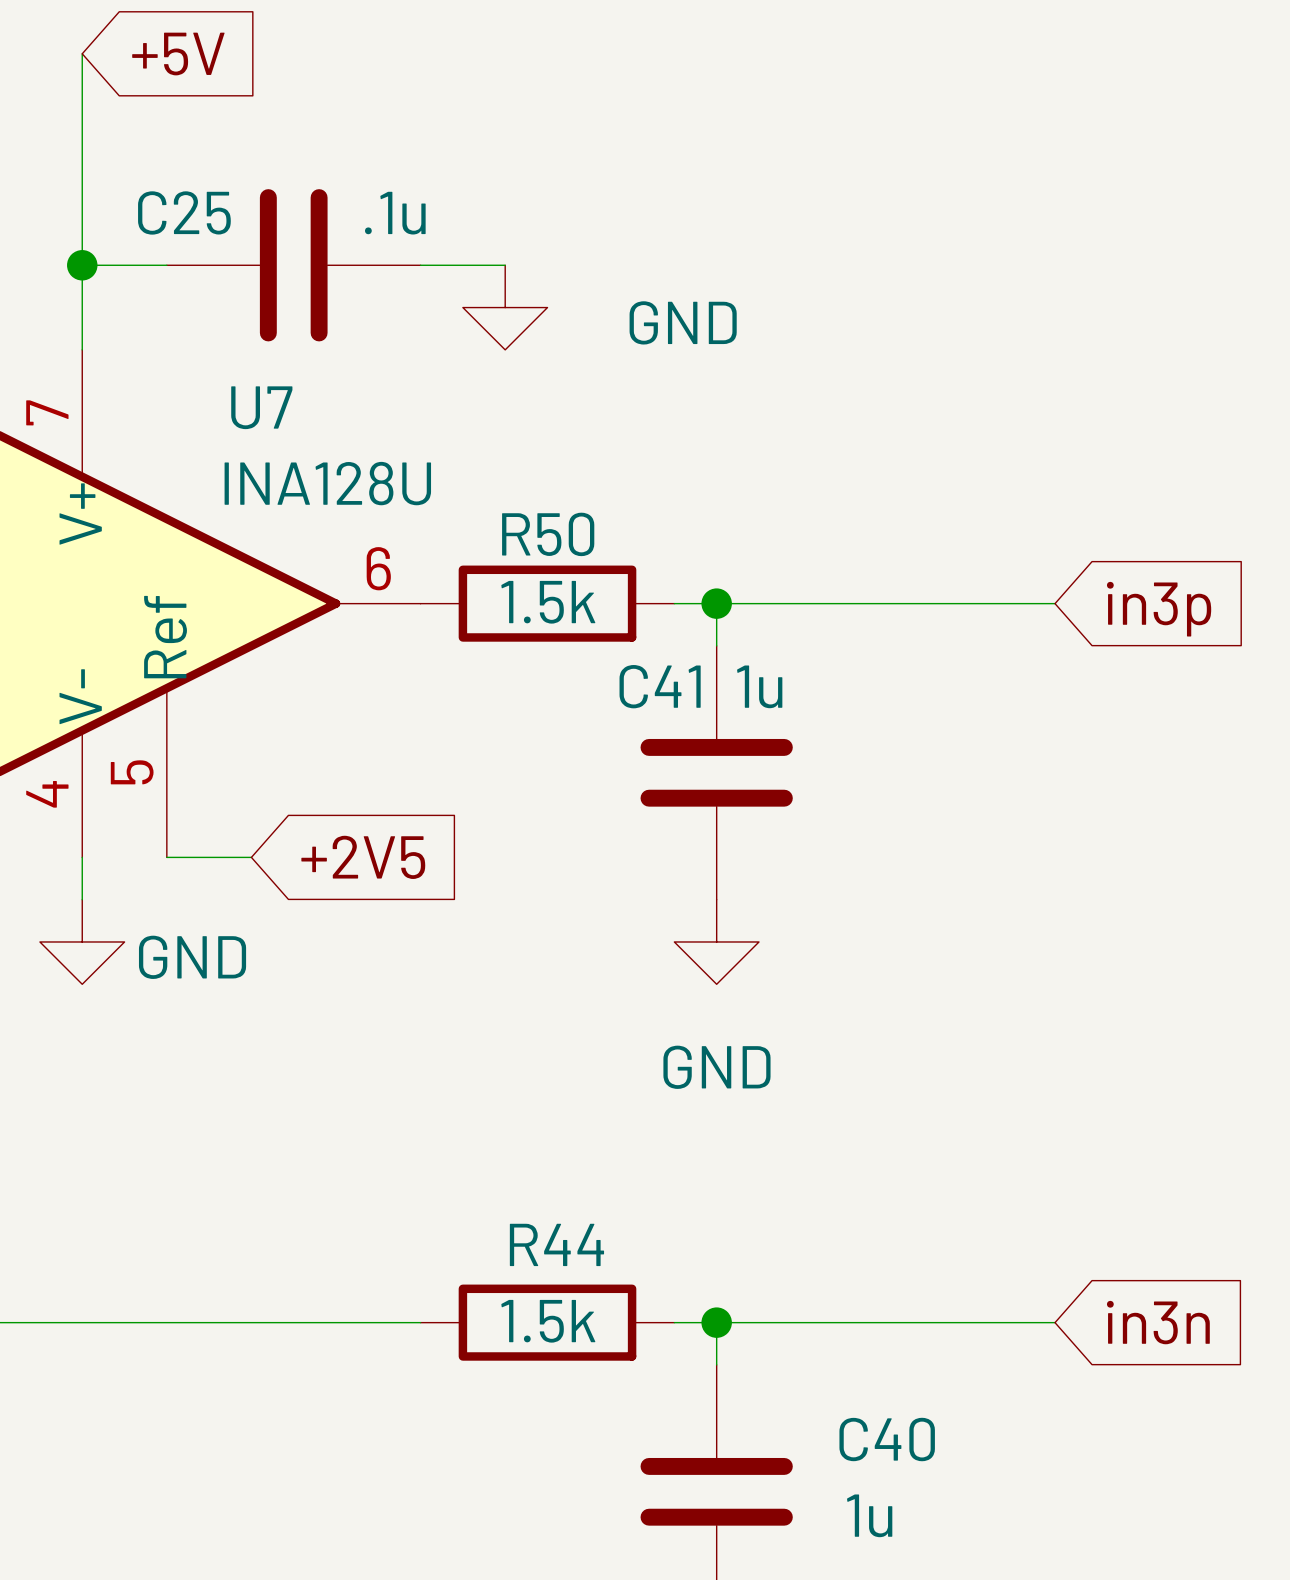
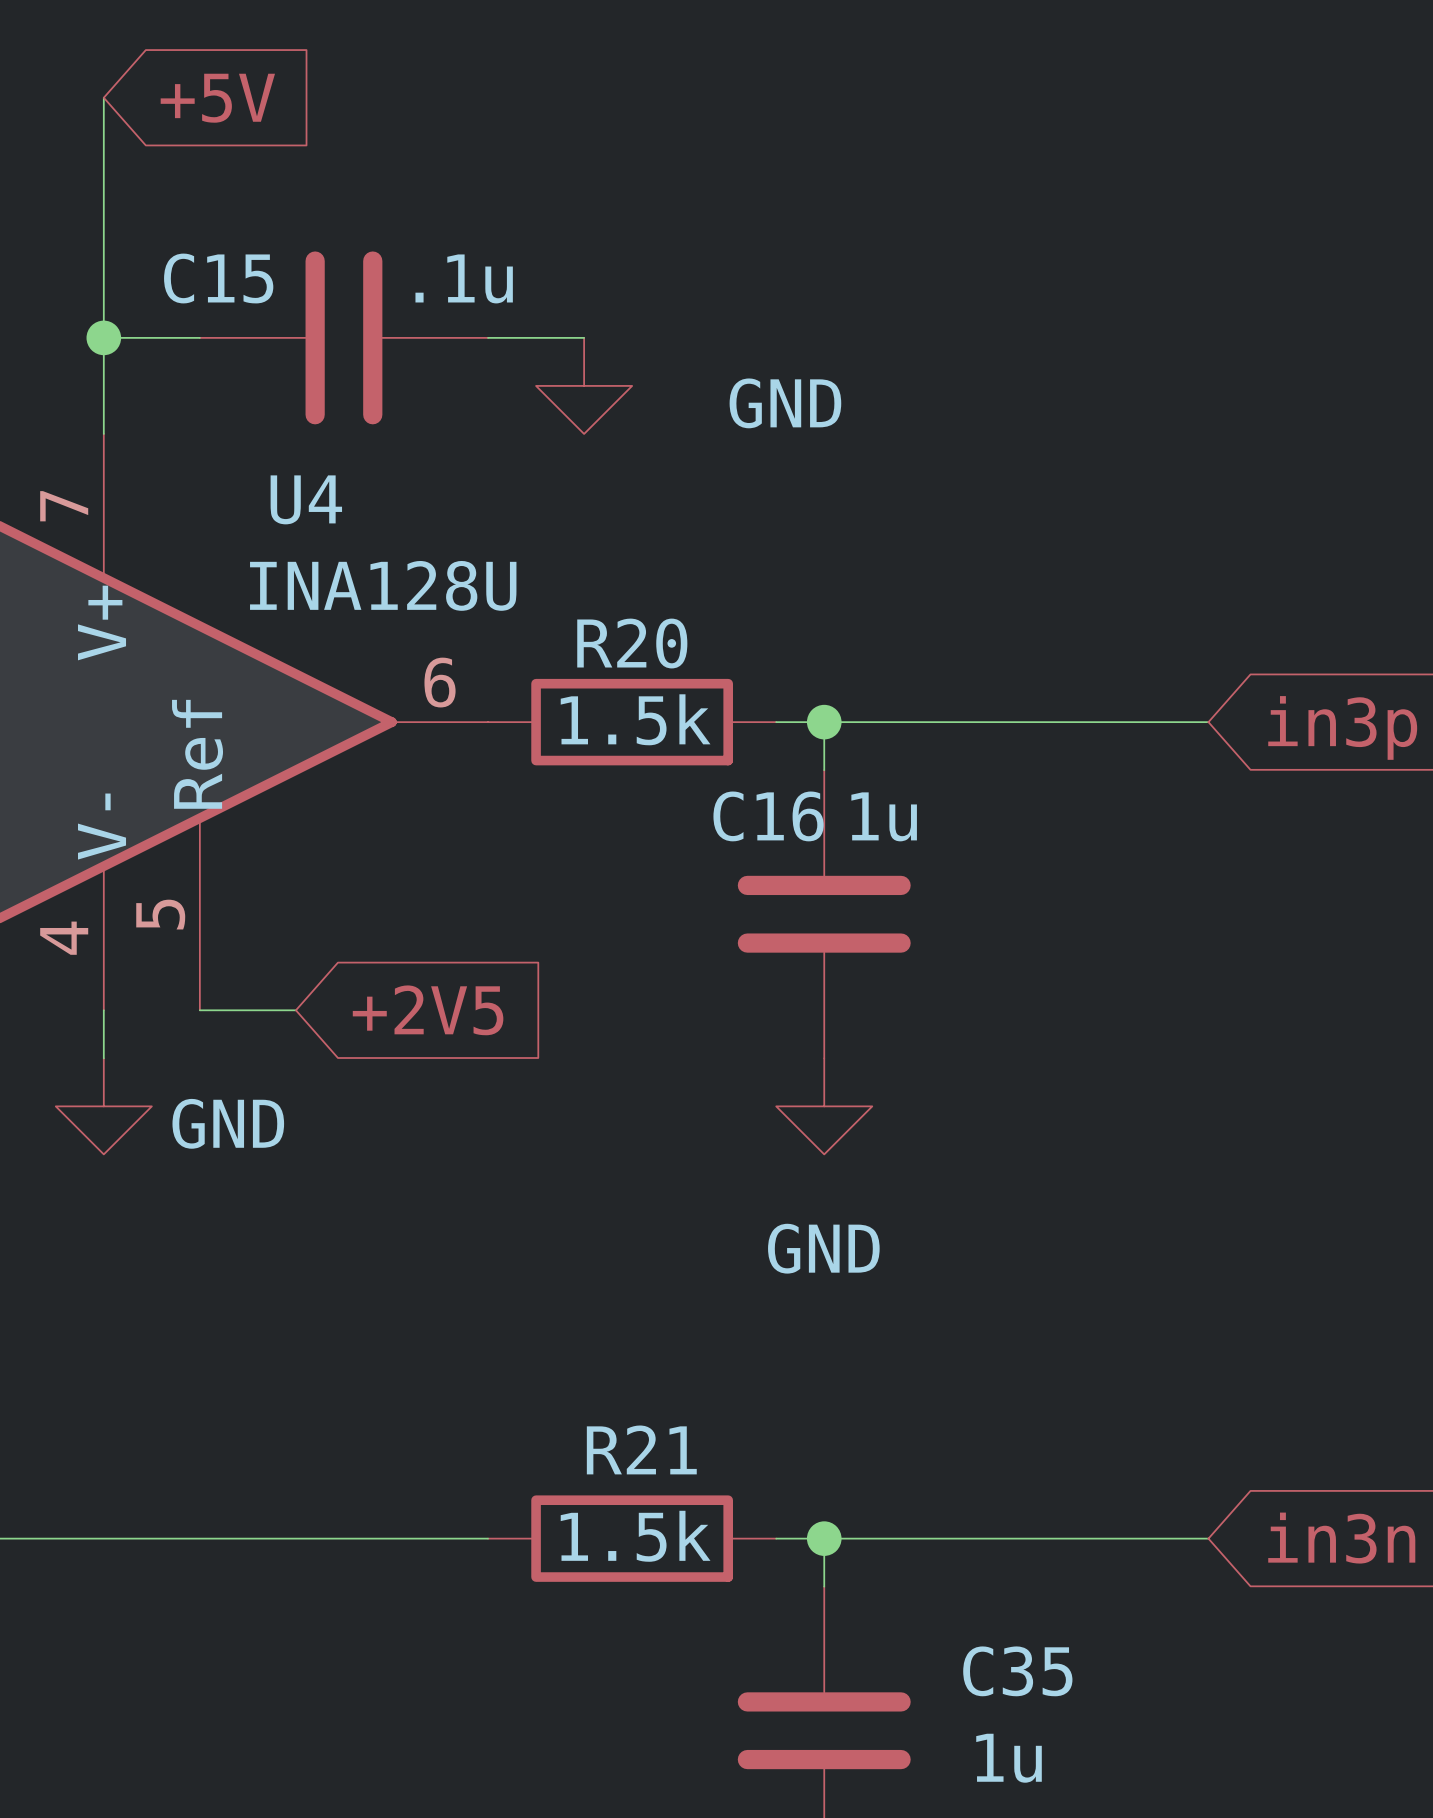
C25 name: C25 (184, 212) -> C15 (218, 278)
U7 name: U7 (261, 407) -> U4 (306, 499)
R50 name: R50 (548, 534) -> R20 (632, 643)
C41 name: C41 (660, 686) -> C16 (768, 816)
R44 name: R44 (556, 1244) -> R21 (641, 1449)
C40 name: C40 (887, 1439) -> C35 (1017, 1671)

